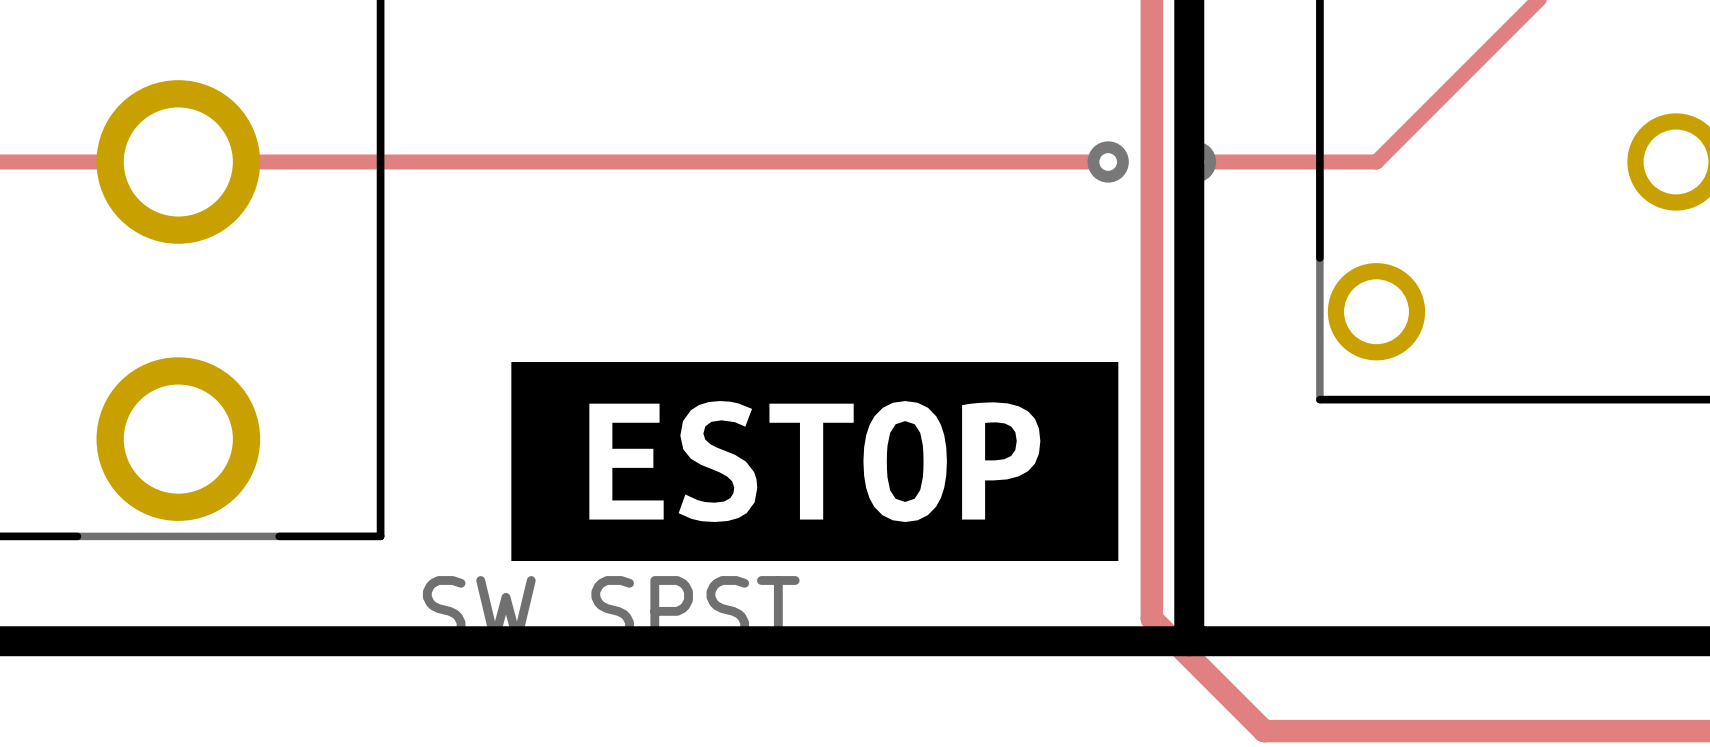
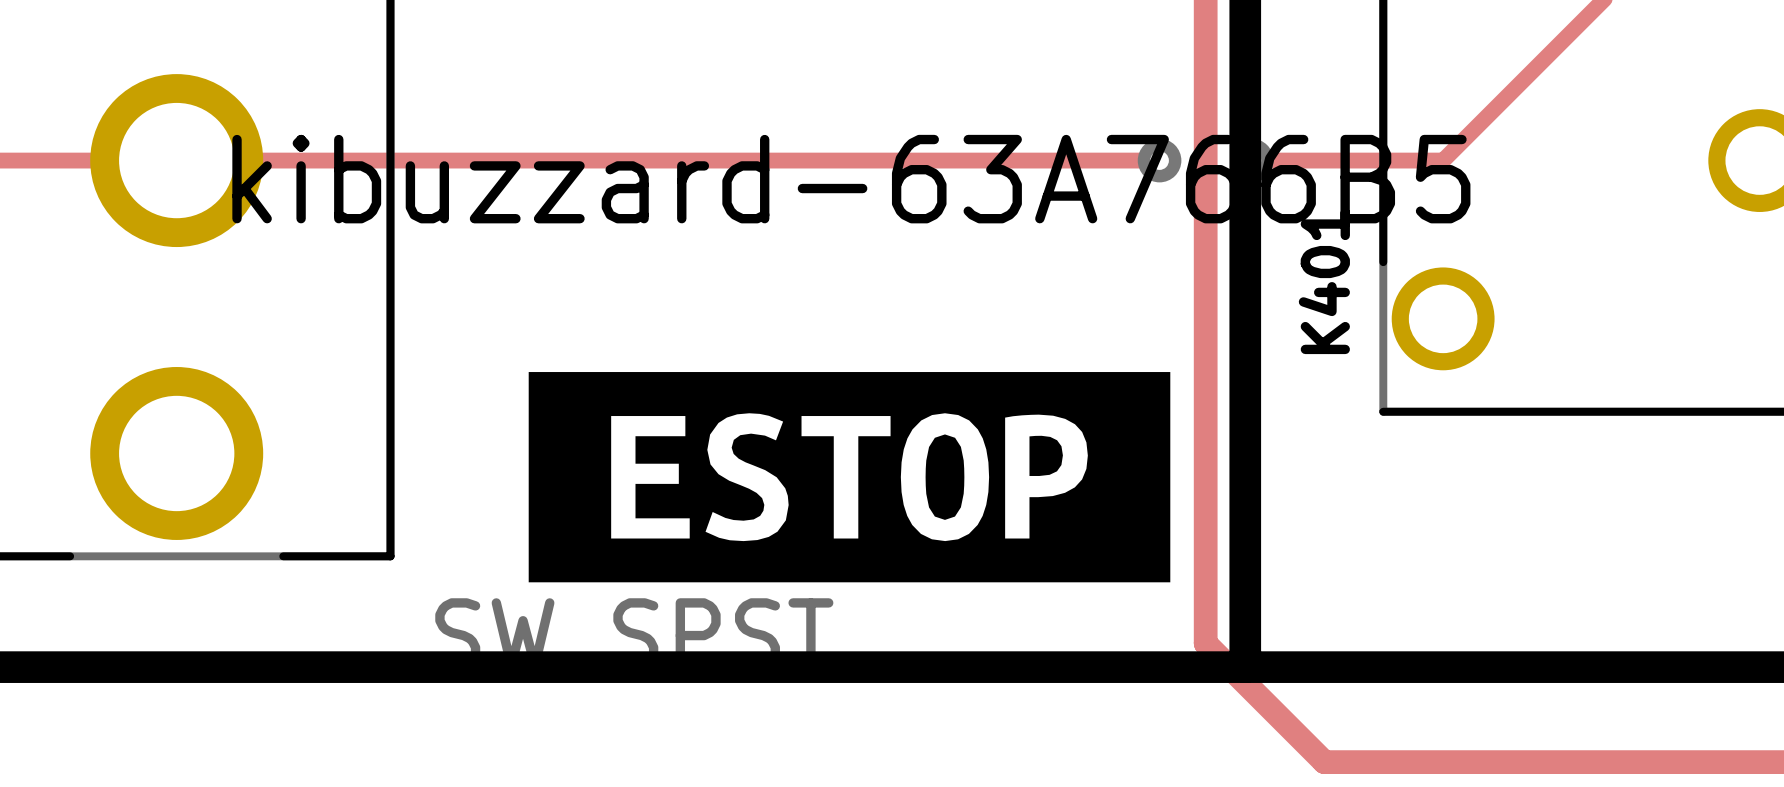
K401 name: none -> K401 (1324, 281)
kibuzzard-63A766B5: none -> (849, 477)

